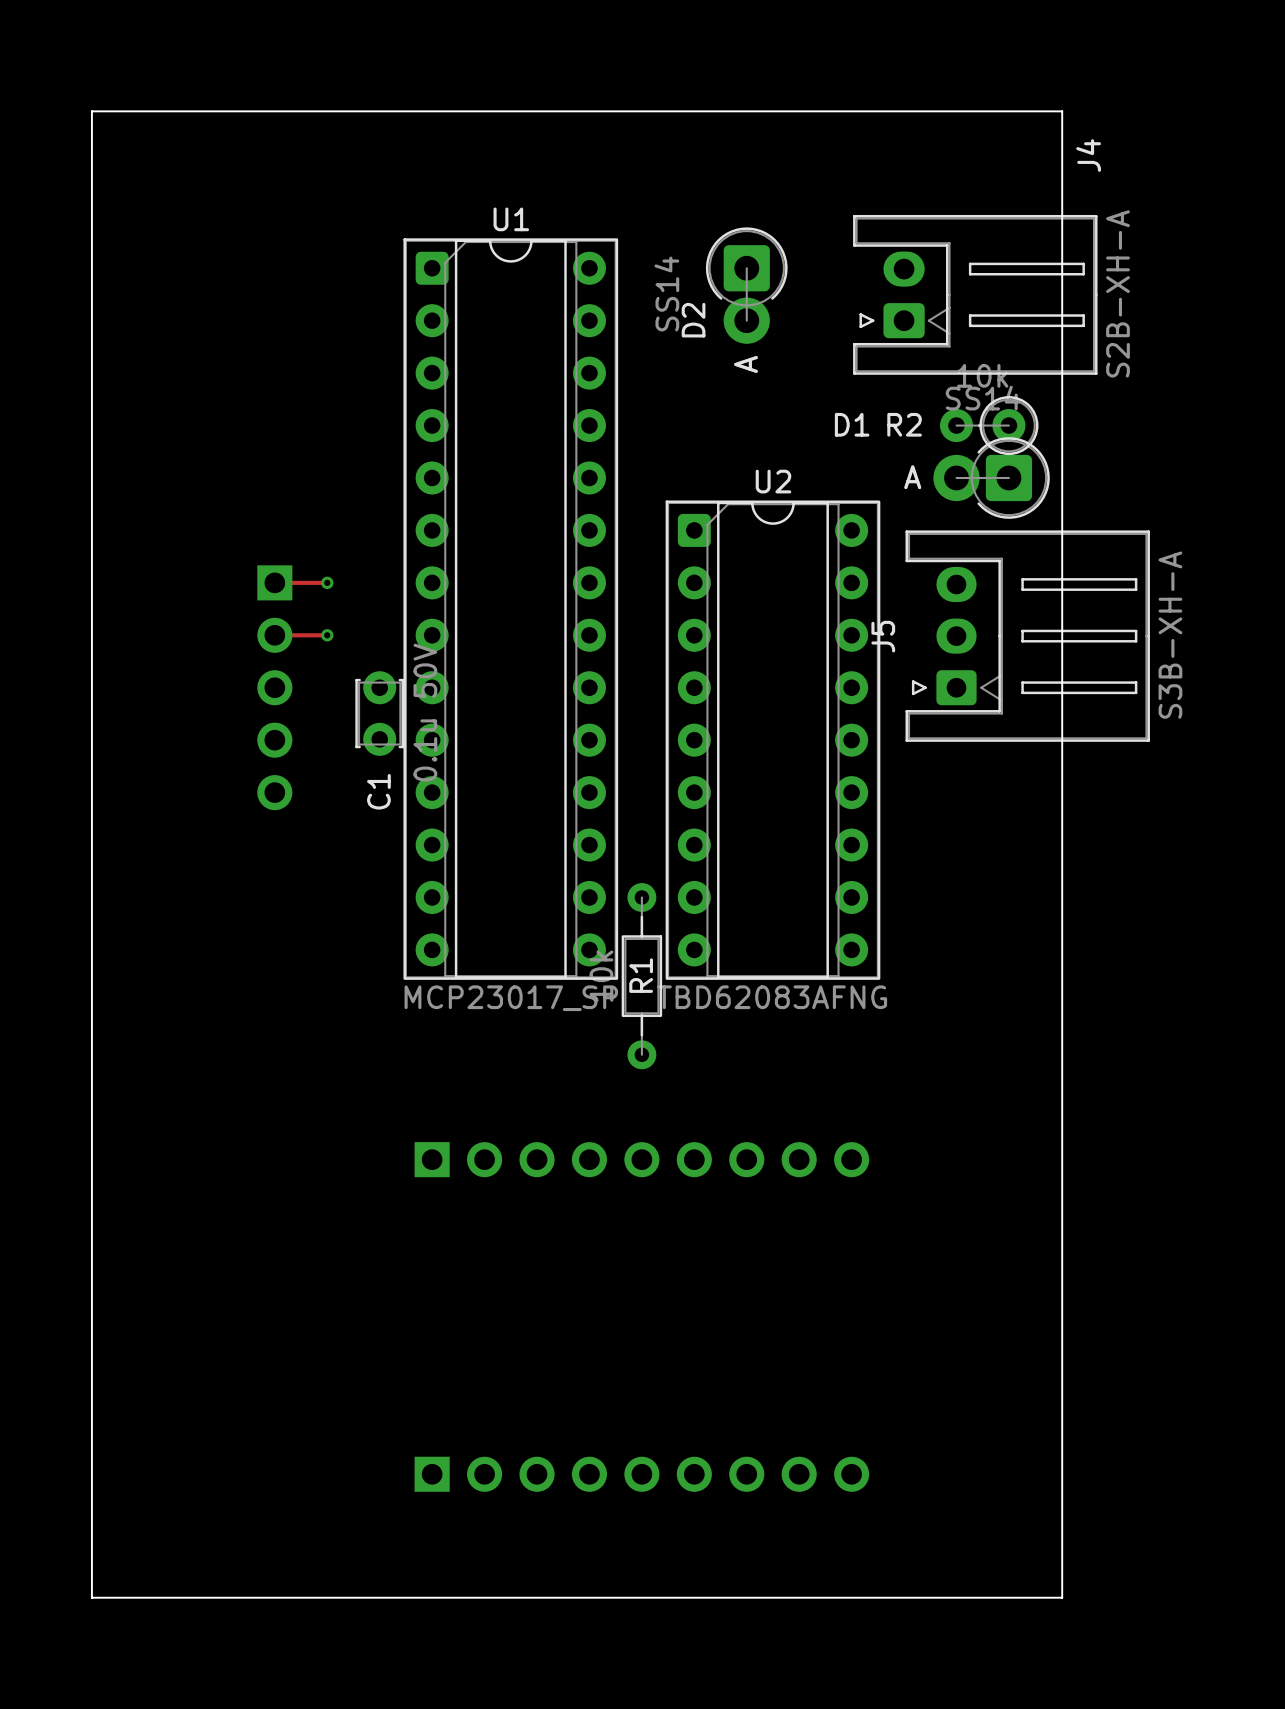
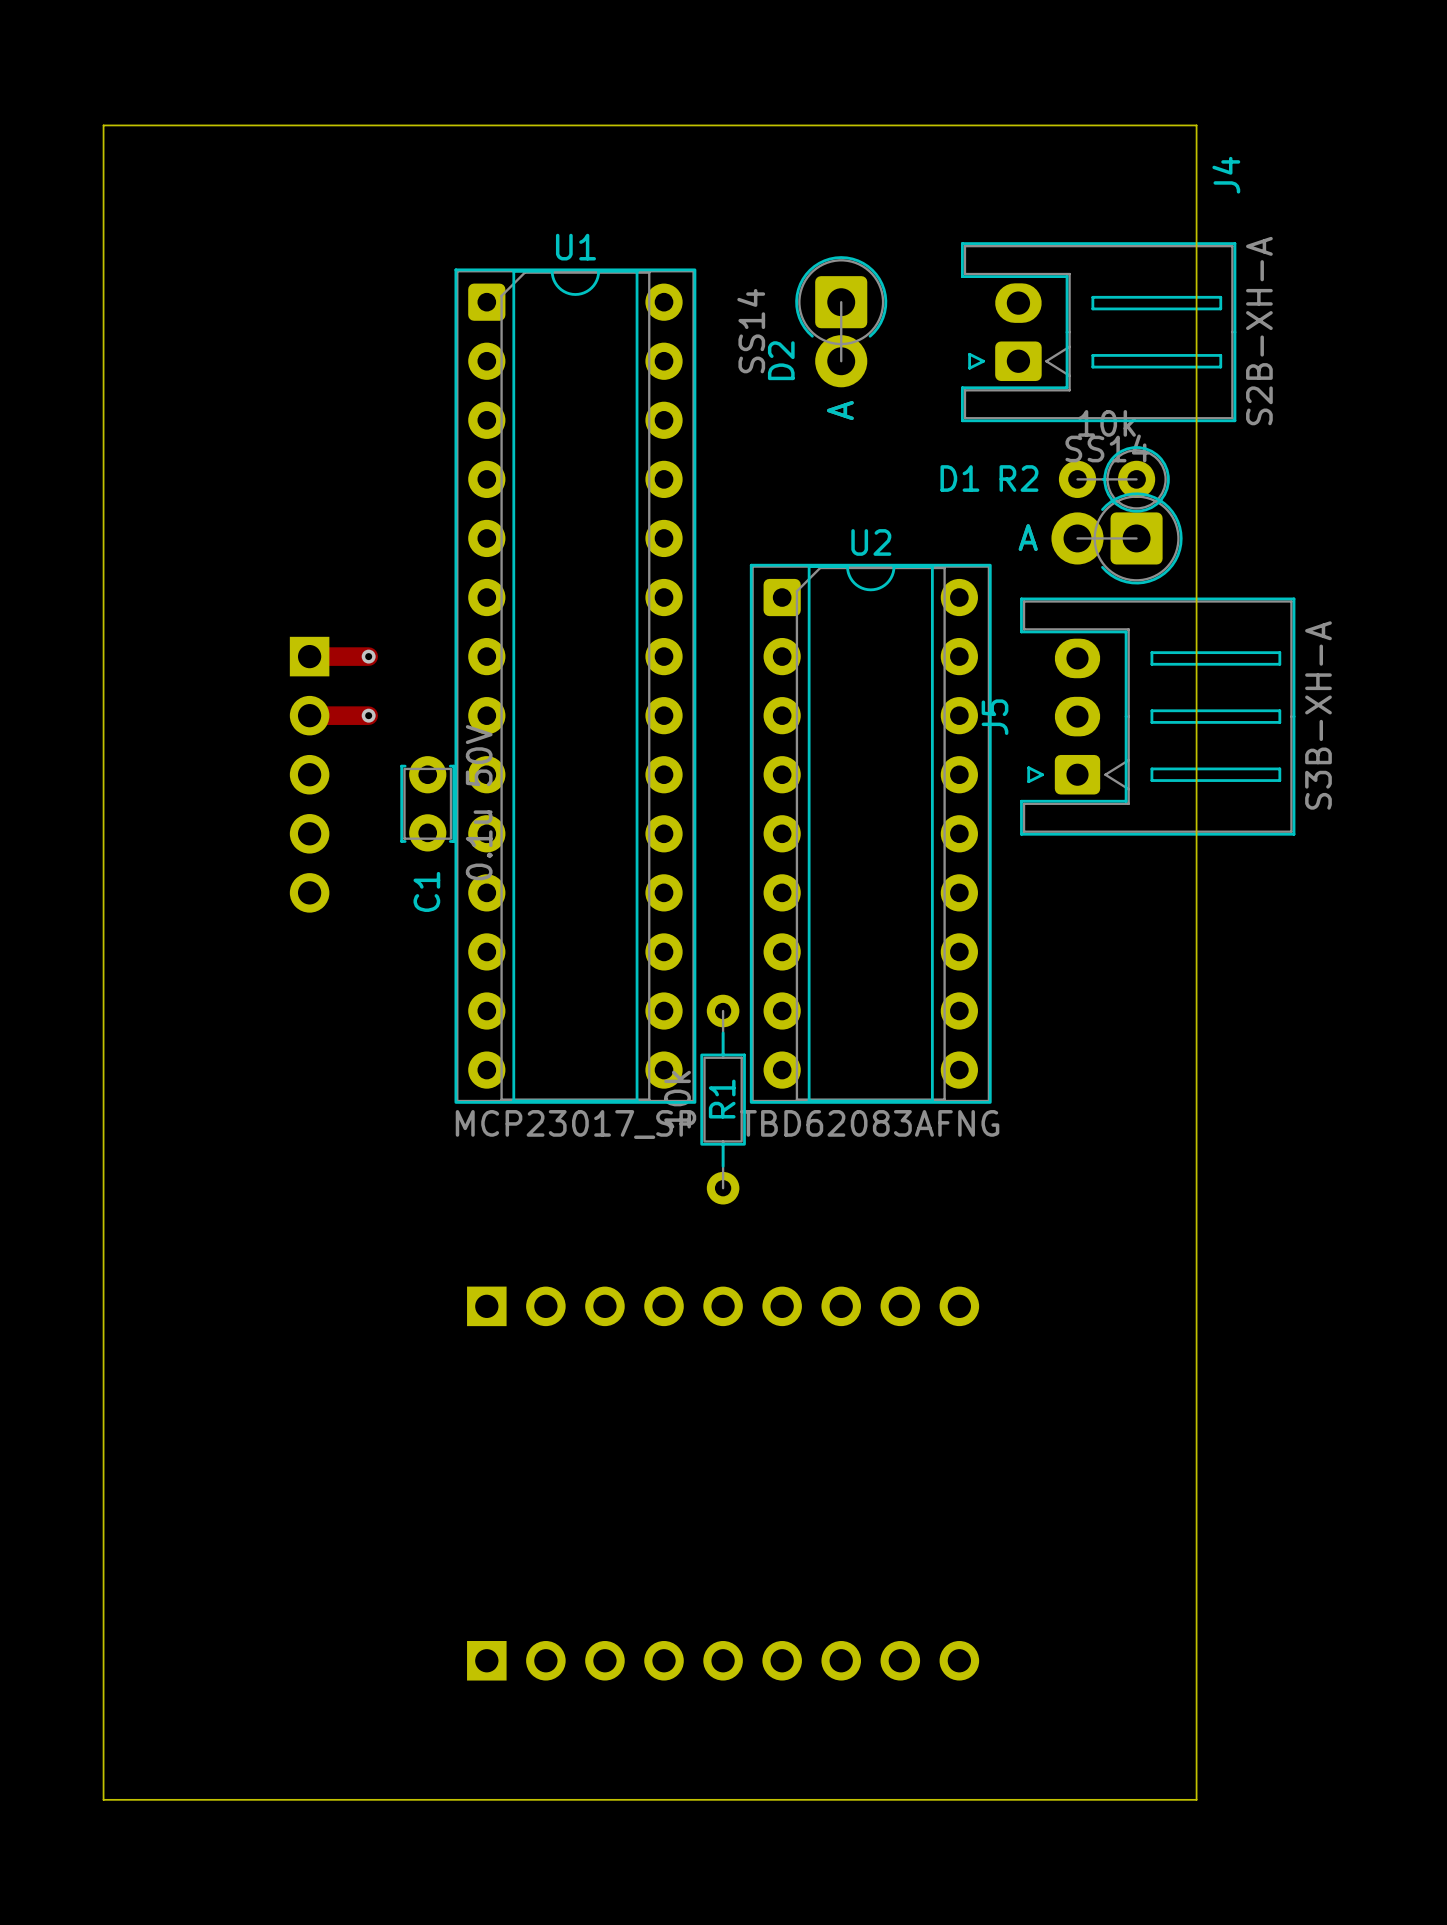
track width: thin (274, 582) (327, 582) -> thick (309, 656) (368, 656)
track width: thin (274, 635) (327, 635) -> thick (309, 715) (368, 715)

